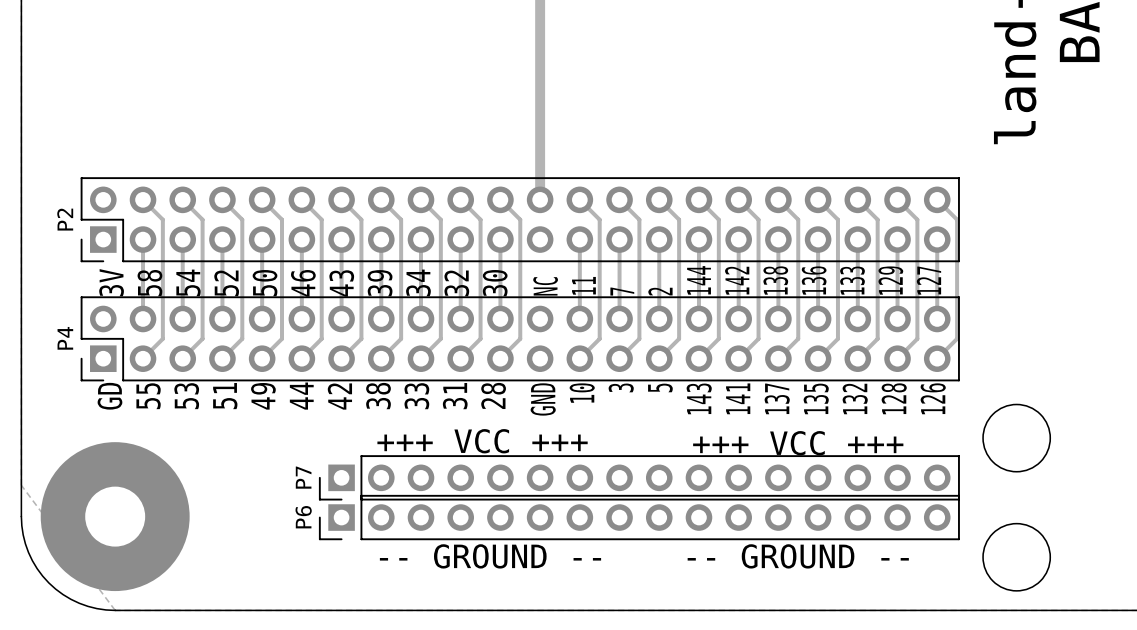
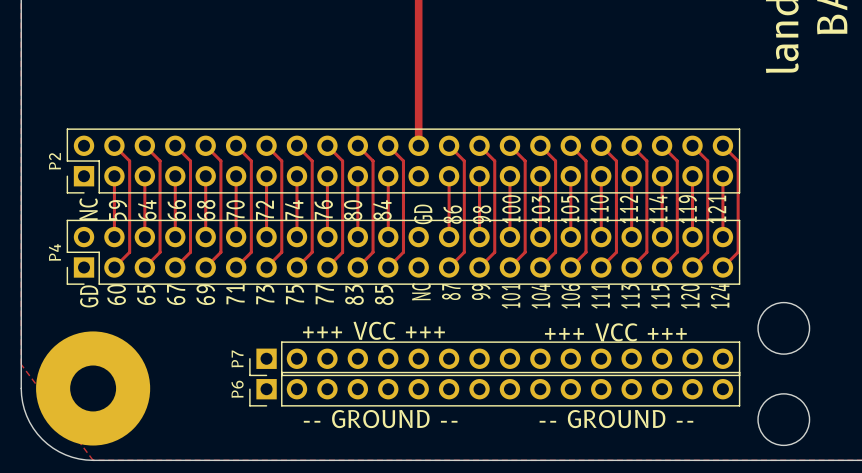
text: 144 (699, 280) -> 103 (540, 209)
text: 142 (737, 280) -> 105 (570, 209)
text: 138 (775, 280) -> 110 (599, 209)
text: 136 (814, 280) -> 112 (628, 209)
text: 133 (852, 280) -> 114 (658, 209)
text: 129 (890, 280) -> 119 (687, 209)
text: 127 (928, 280) -> 121 (717, 209)
text: 3V (111, 282) -> NC (88, 209)
text: 54 (188, 282) -> 64 (147, 210)
text: 34 (418, 282) -> 76 (323, 210)
text: 58 (149, 283) -> 59 (118, 210)
text: 52 (226, 283) -> 66 (176, 210)
text: 50 (265, 283) -> 68 (206, 210)
text: 46 (303, 283) -> 70 (235, 210)
text: 43 (341, 283) -> 72 (264, 210)
text: 39 (380, 283) -> 74 (294, 210)
text: 32 (456, 283) -> 80 (353, 210)
text: 30 (495, 283) -> 84 (382, 210)
text: 11 (583, 285) -> 86 (452, 214)
text position: NC (545, 286) -> NC (421, 291)
text: none -> GD (423, 214)
text: 7 (622, 291) -> 98 (482, 214)
text: 2 (660, 291) -> 100 (511, 209)
text: 3 (621, 387) -> 99 (481, 291)
text: 5 (660, 387) -> 101 (511, 296)
text: 10 (582, 393) -> 87 (451, 292)
text: 28 (493, 395) -> 85 (384, 294)
text: 55 (148, 396) -> 60 (116, 294)
text: 53 (186, 396) -> 65 (146, 294)
text: 51 (225, 396) -> 67 (176, 294)
text: 49 (263, 396) -> 69 (205, 294)
text: 44 (301, 396) -> 71 (235, 294)
text: 42 (339, 396) -> 73 (265, 294)
text: 38 (378, 396) -> 75 (295, 294)
text: 33 (416, 396) -> 77 (324, 294)
text: 31 (455, 396) -> 83 (354, 294)
text: 143 (699, 398) -> 104 (540, 296)
text: 141 (738, 398) -> 106 (570, 296)
text: 137 (777, 398) -> 111 (600, 296)
text: 135 (816, 398) -> 113 (630, 296)
text: 128 (894, 398) -> 120 (690, 296)
text: 126 (933, 398) -> 124 (720, 296)
text: GND (543, 399) -> none
text: 132 (855, 399) -> 115 (660, 296)

